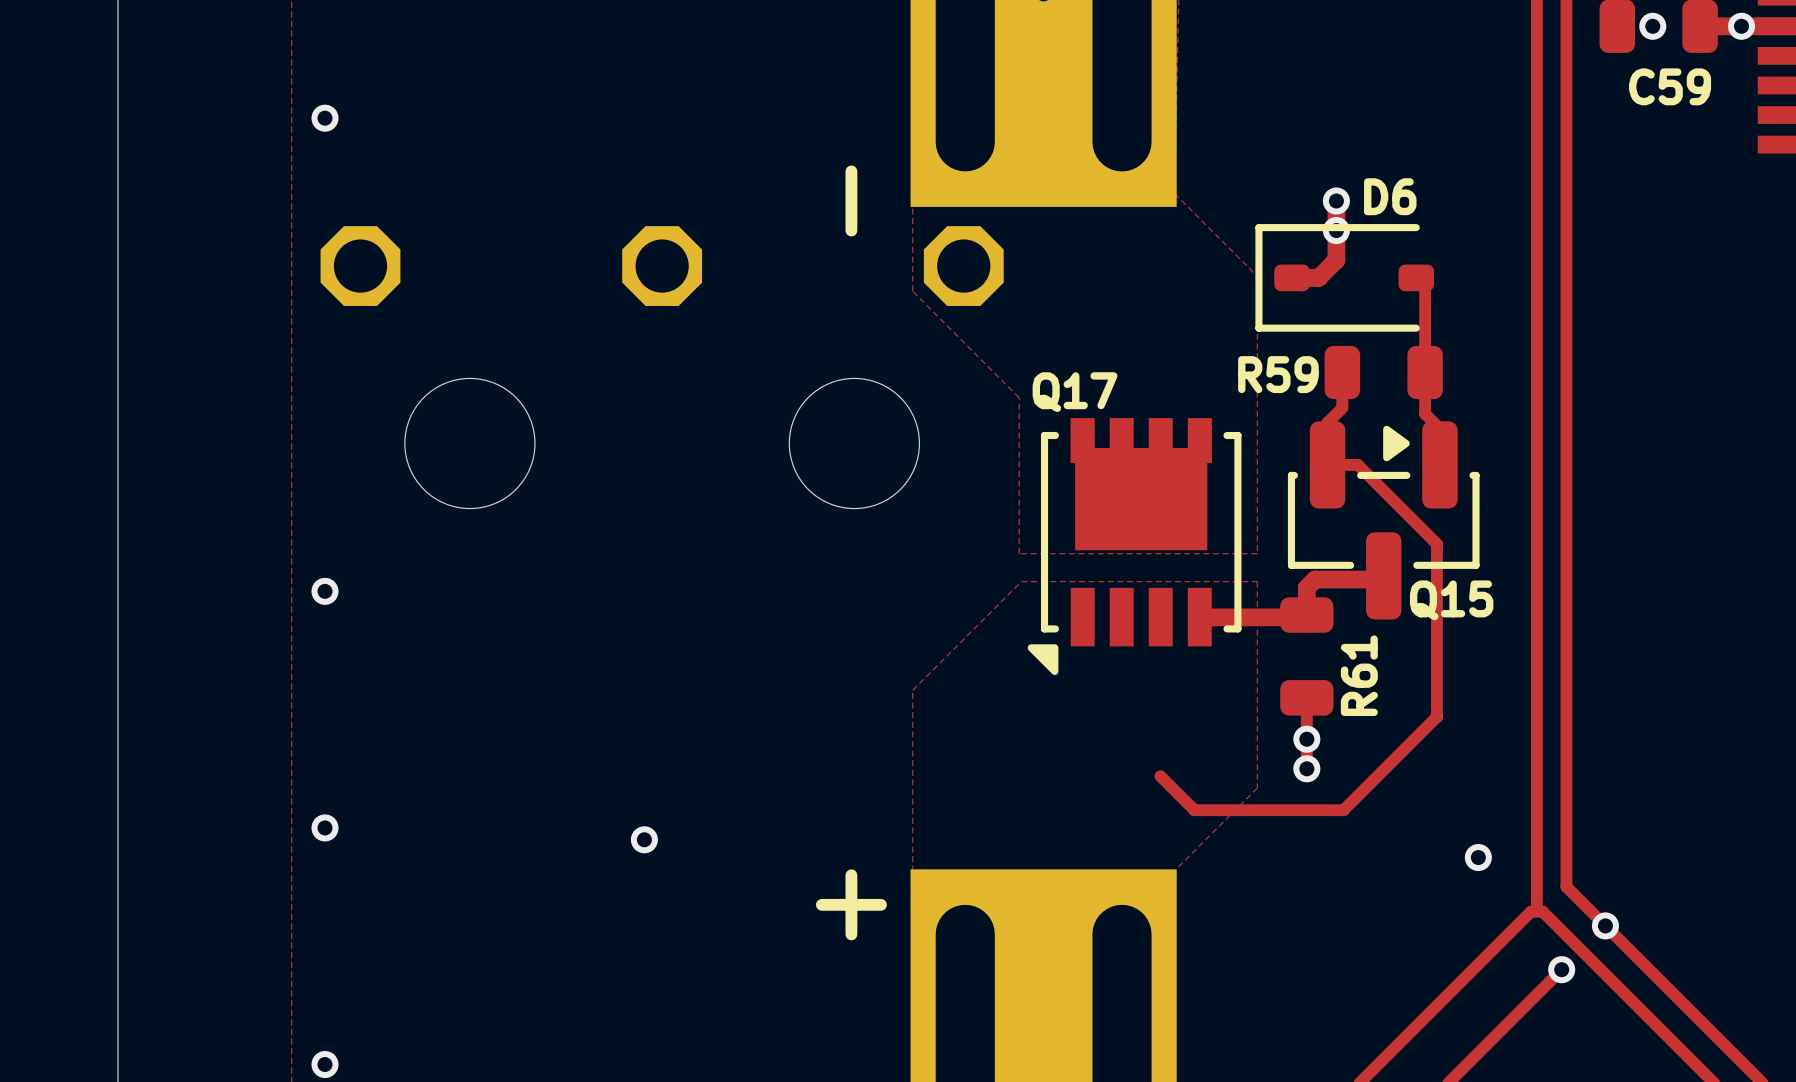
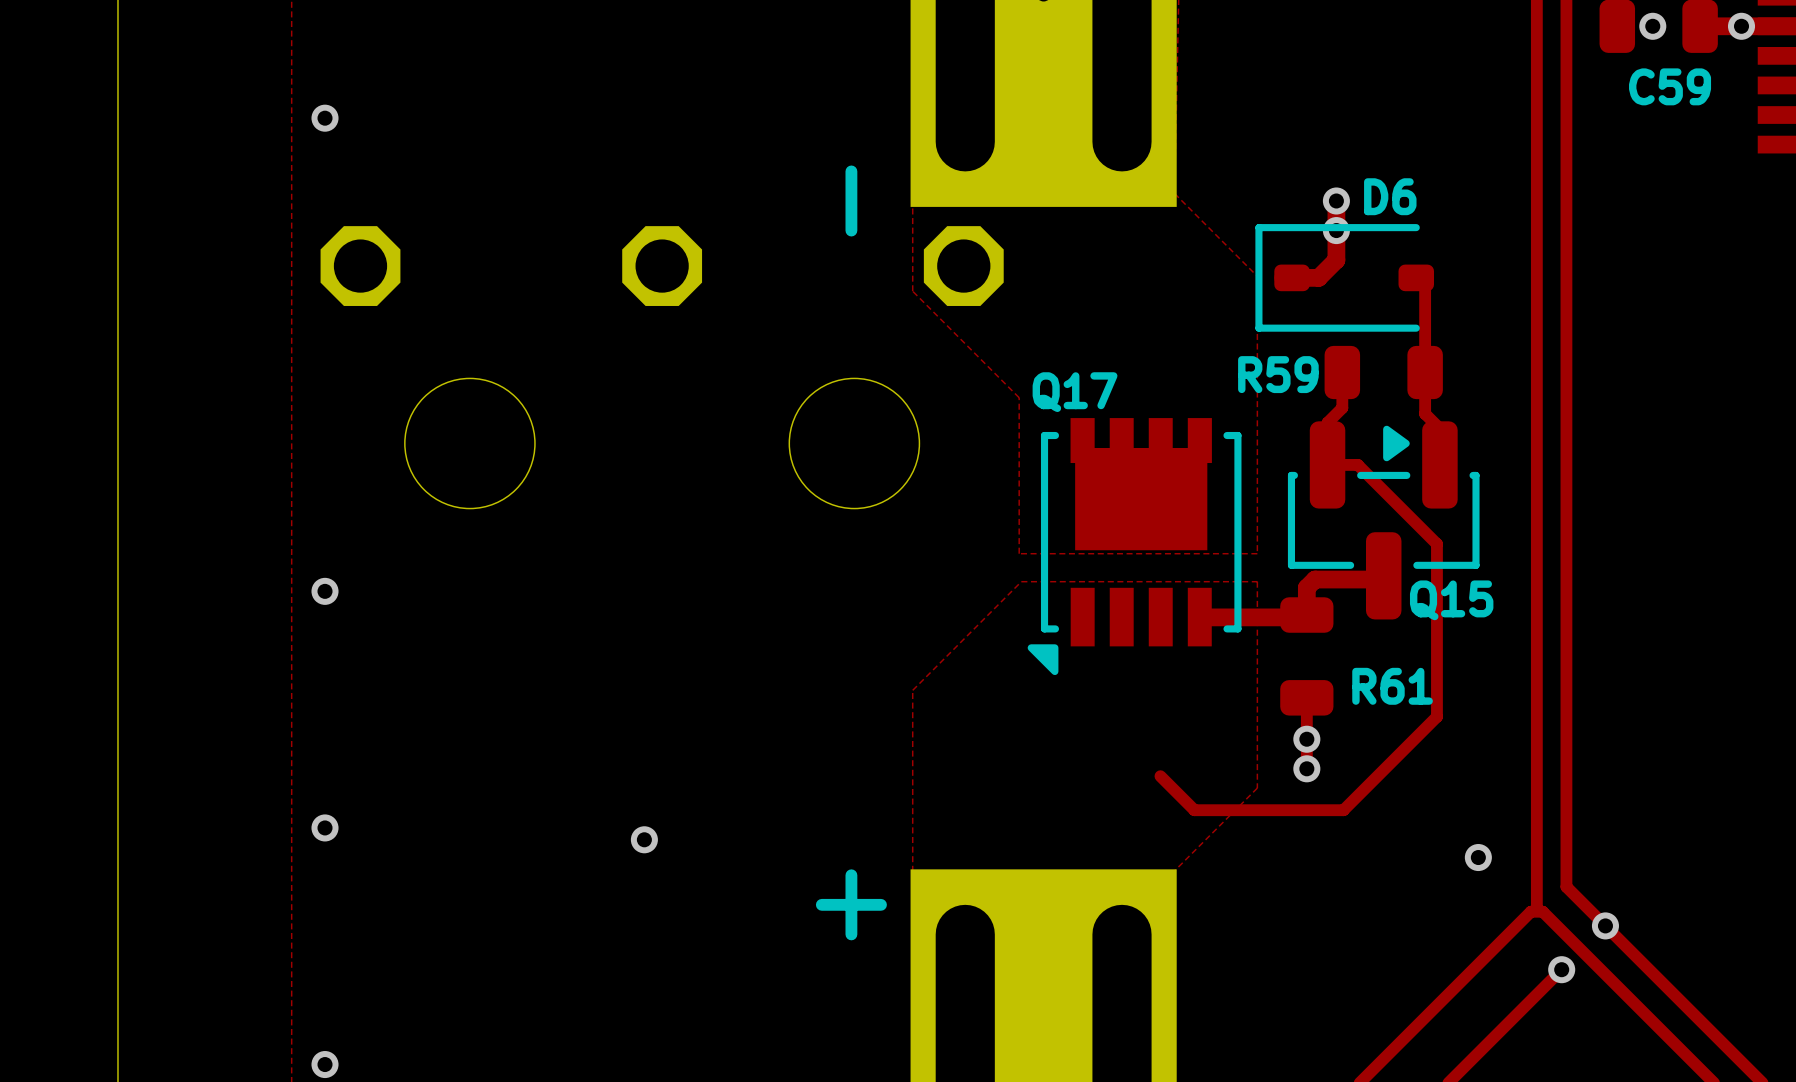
R61 name rotation: 0° (1359, 675) -> 90° clockwise (1392, 686)

